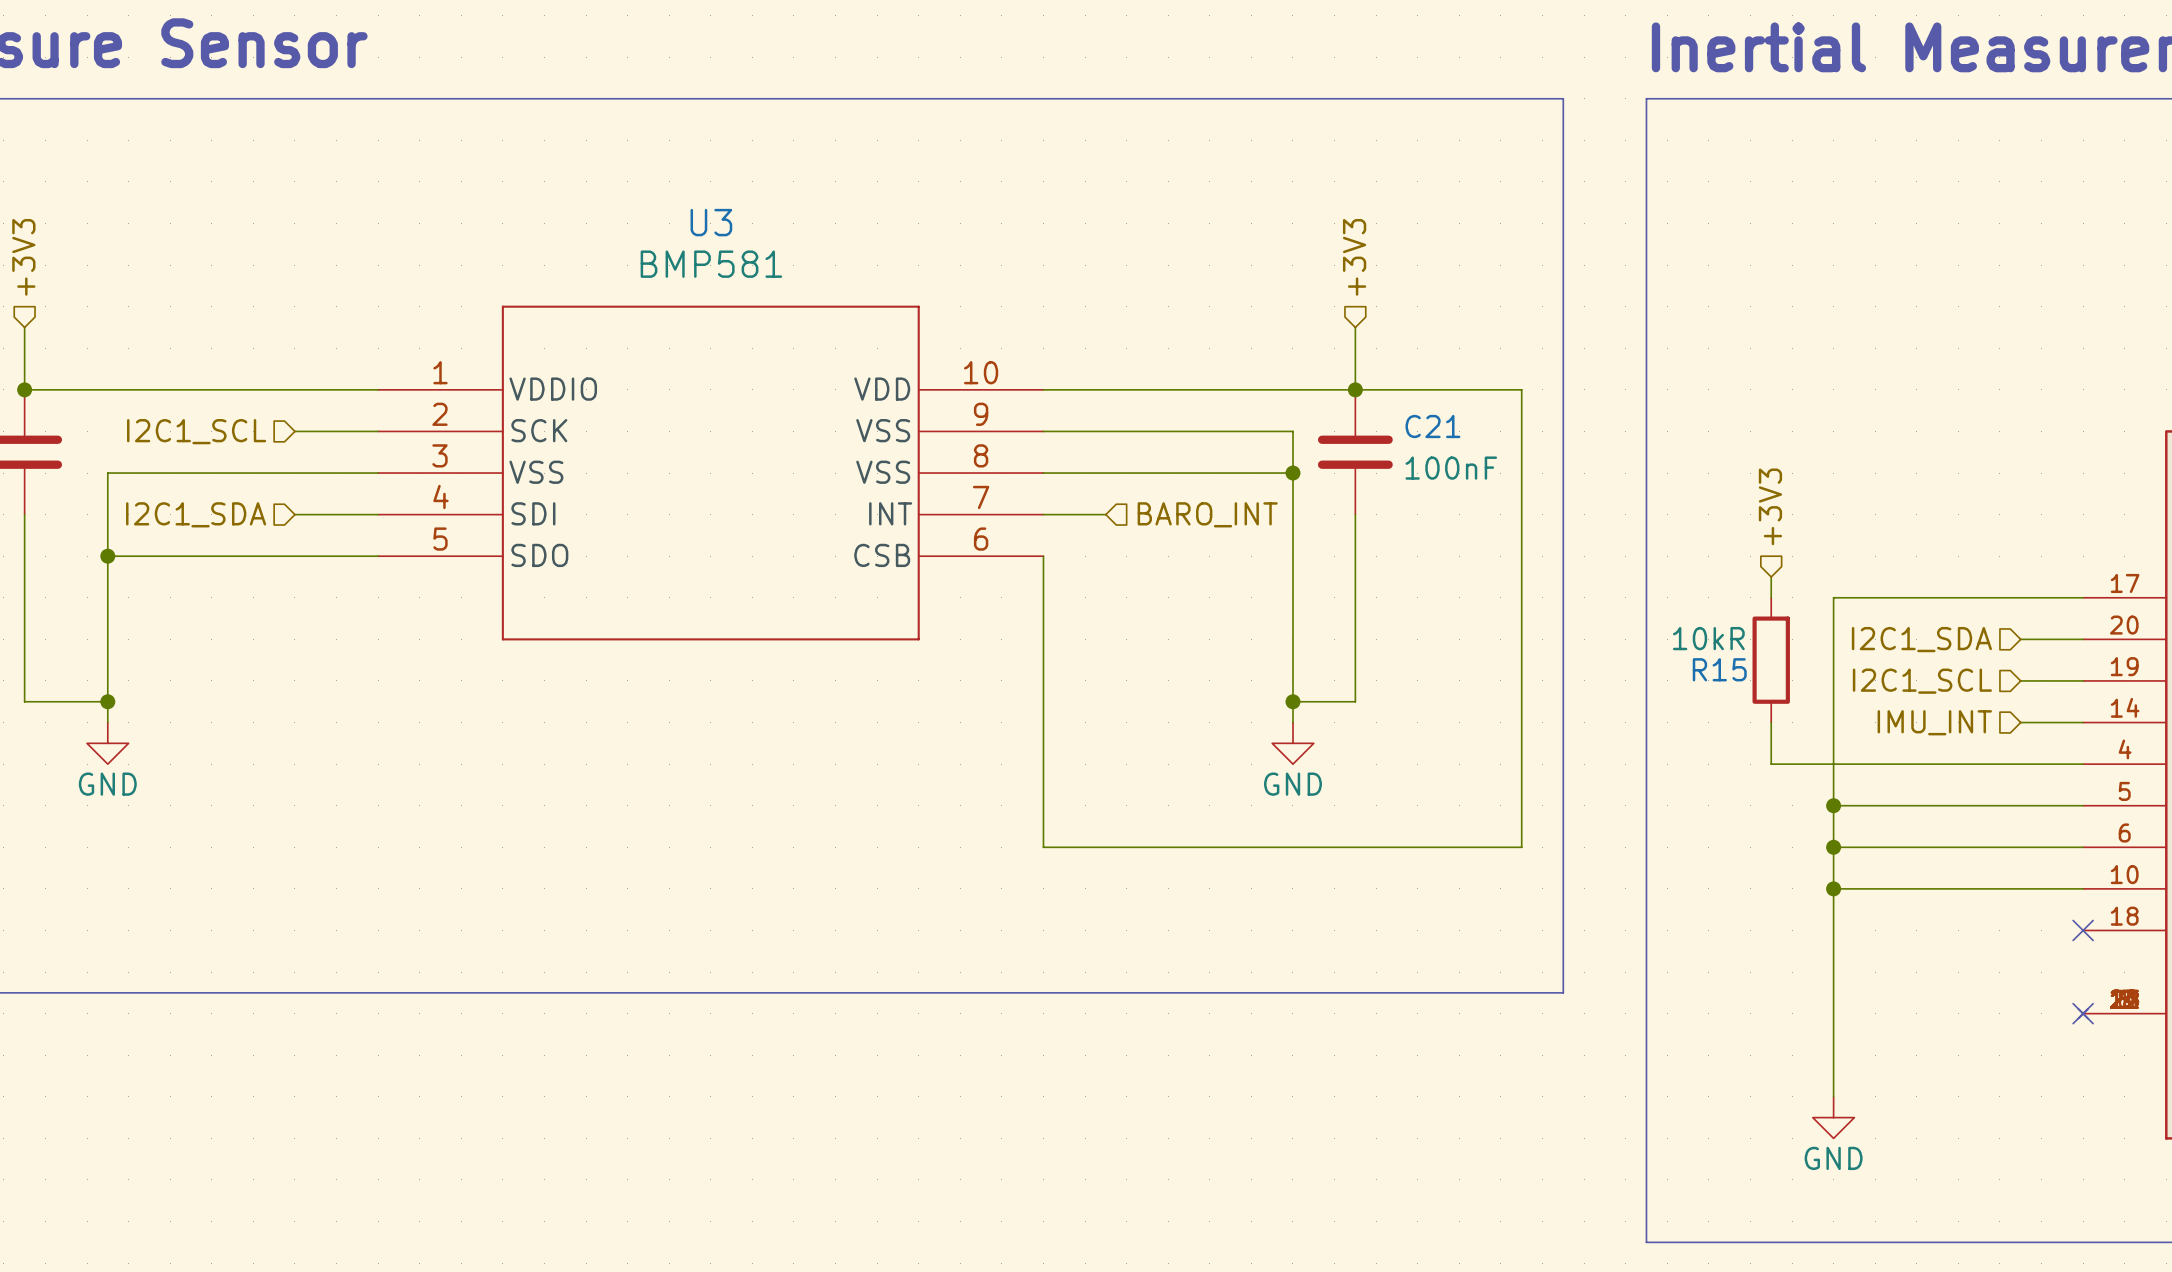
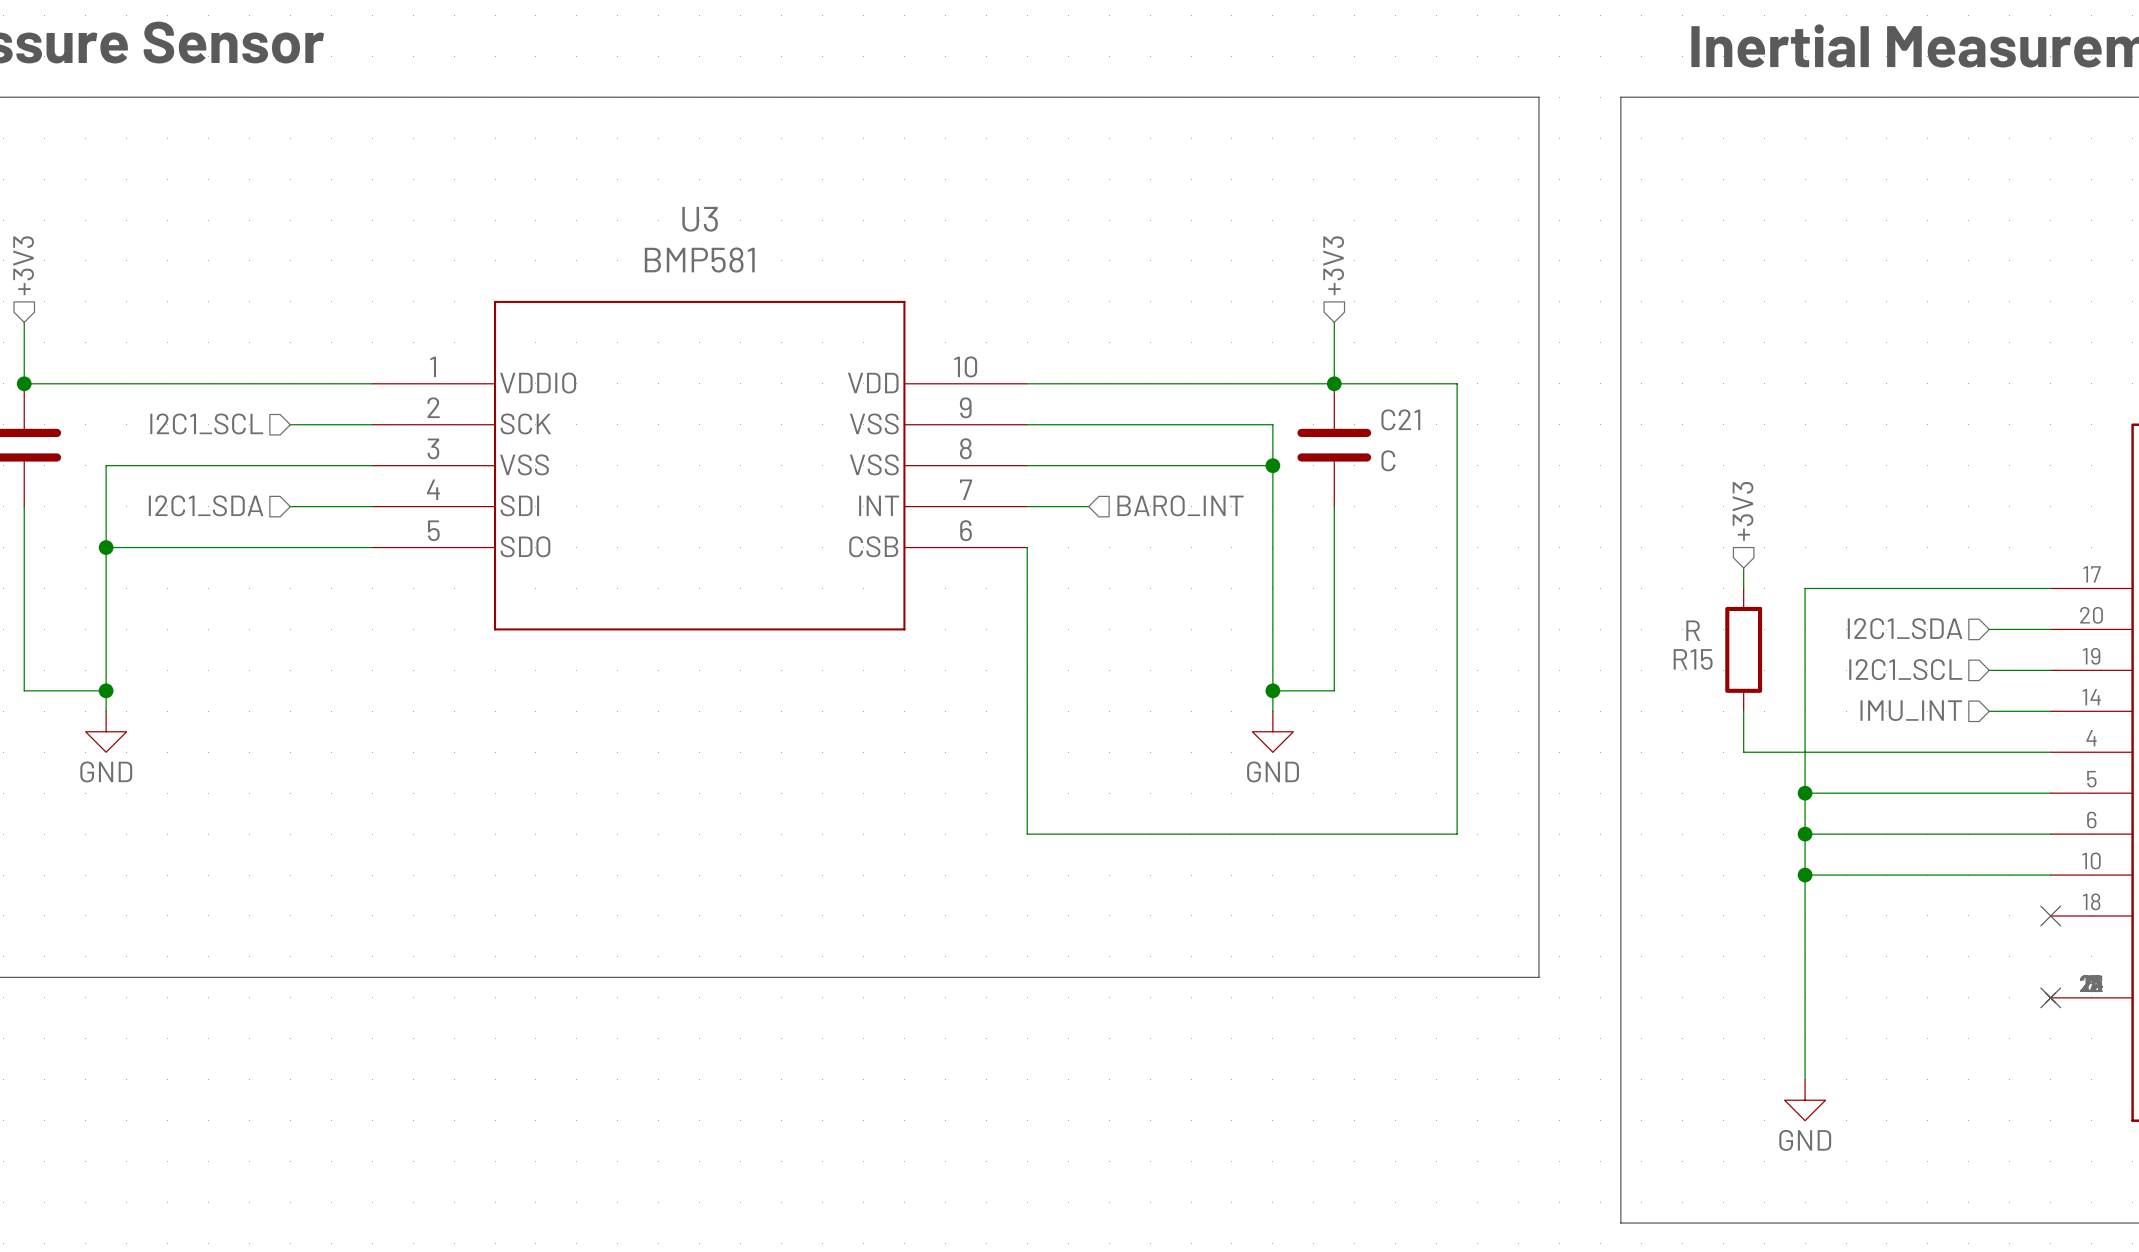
wire: (1480, 389) (1521, 389) (1521, 847) (1480, 847) -> (1457, 383) (1457, 834)
C21 value: 100nF (1451, 468) -> C (1388, 460)
R15 value: 10kR (1708, 638) -> R (1693, 630)

